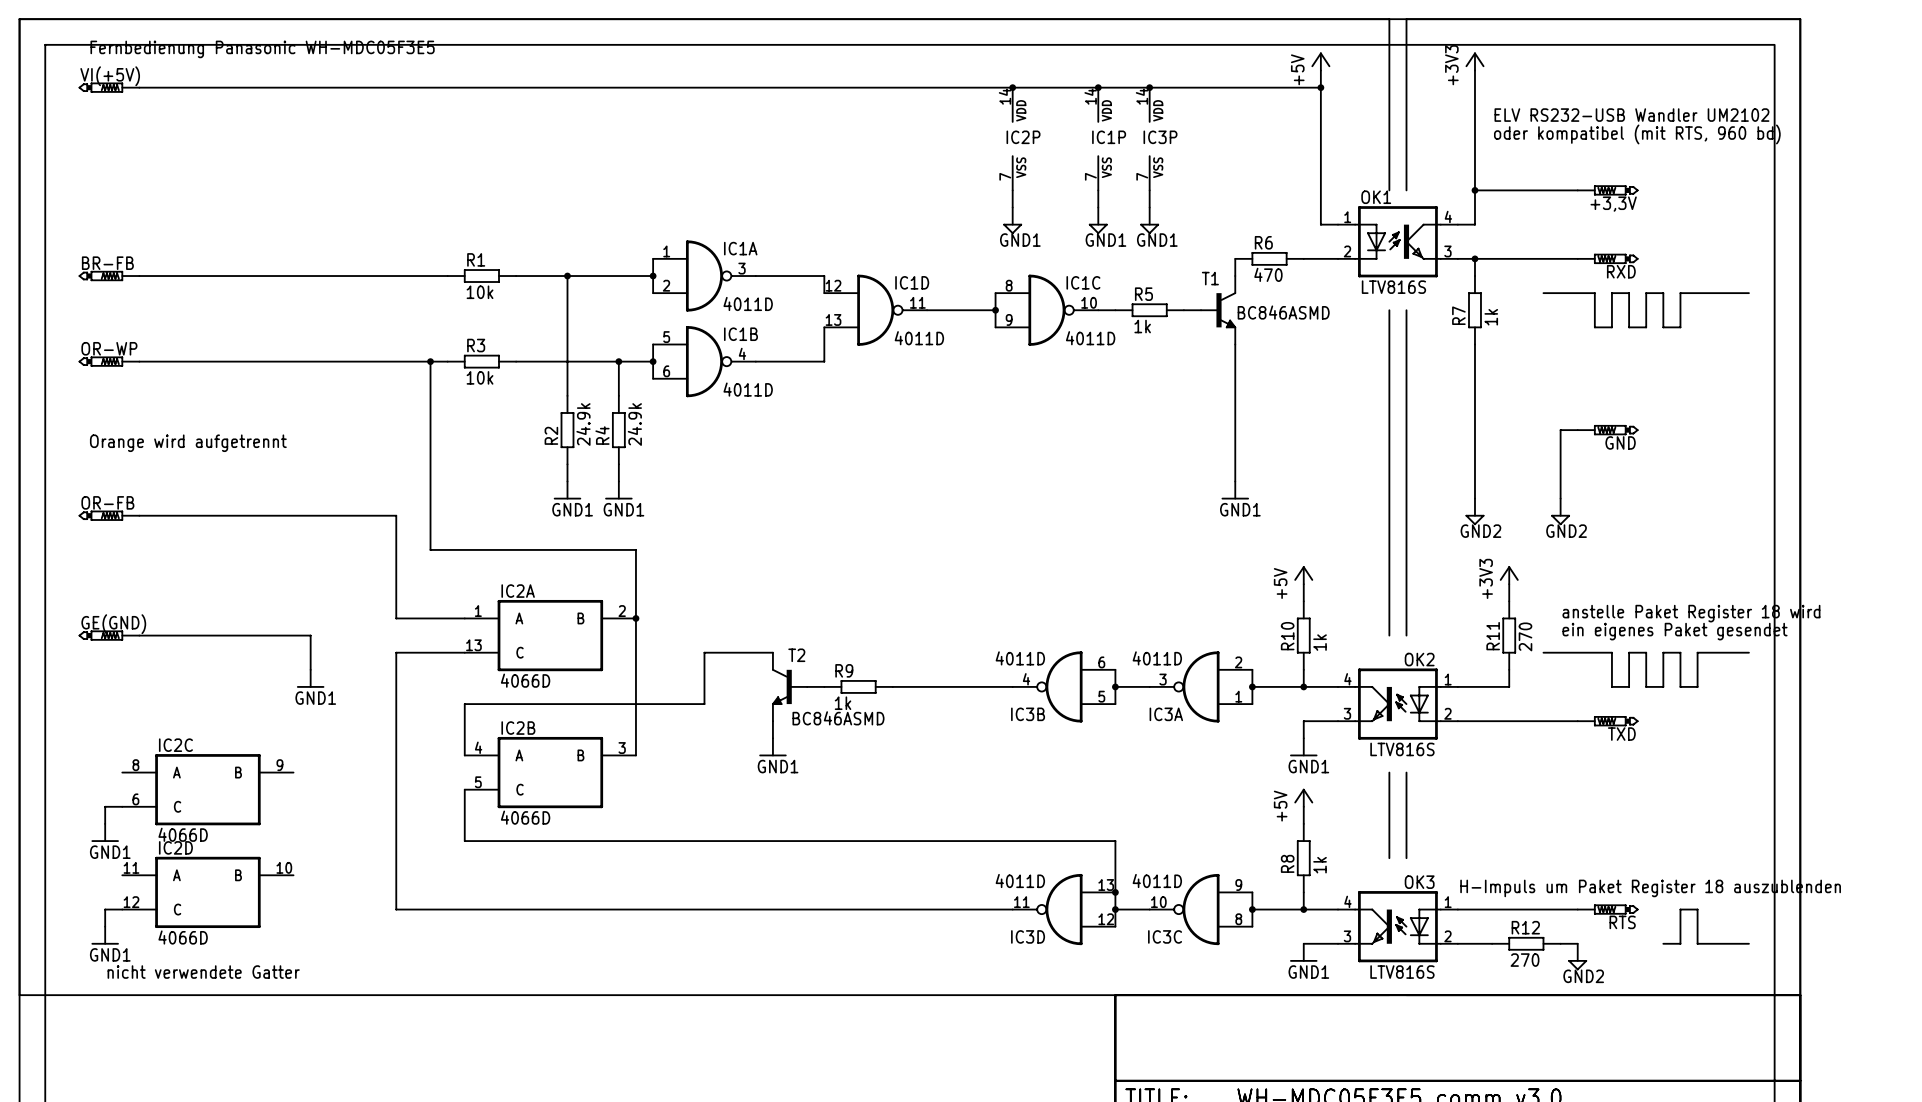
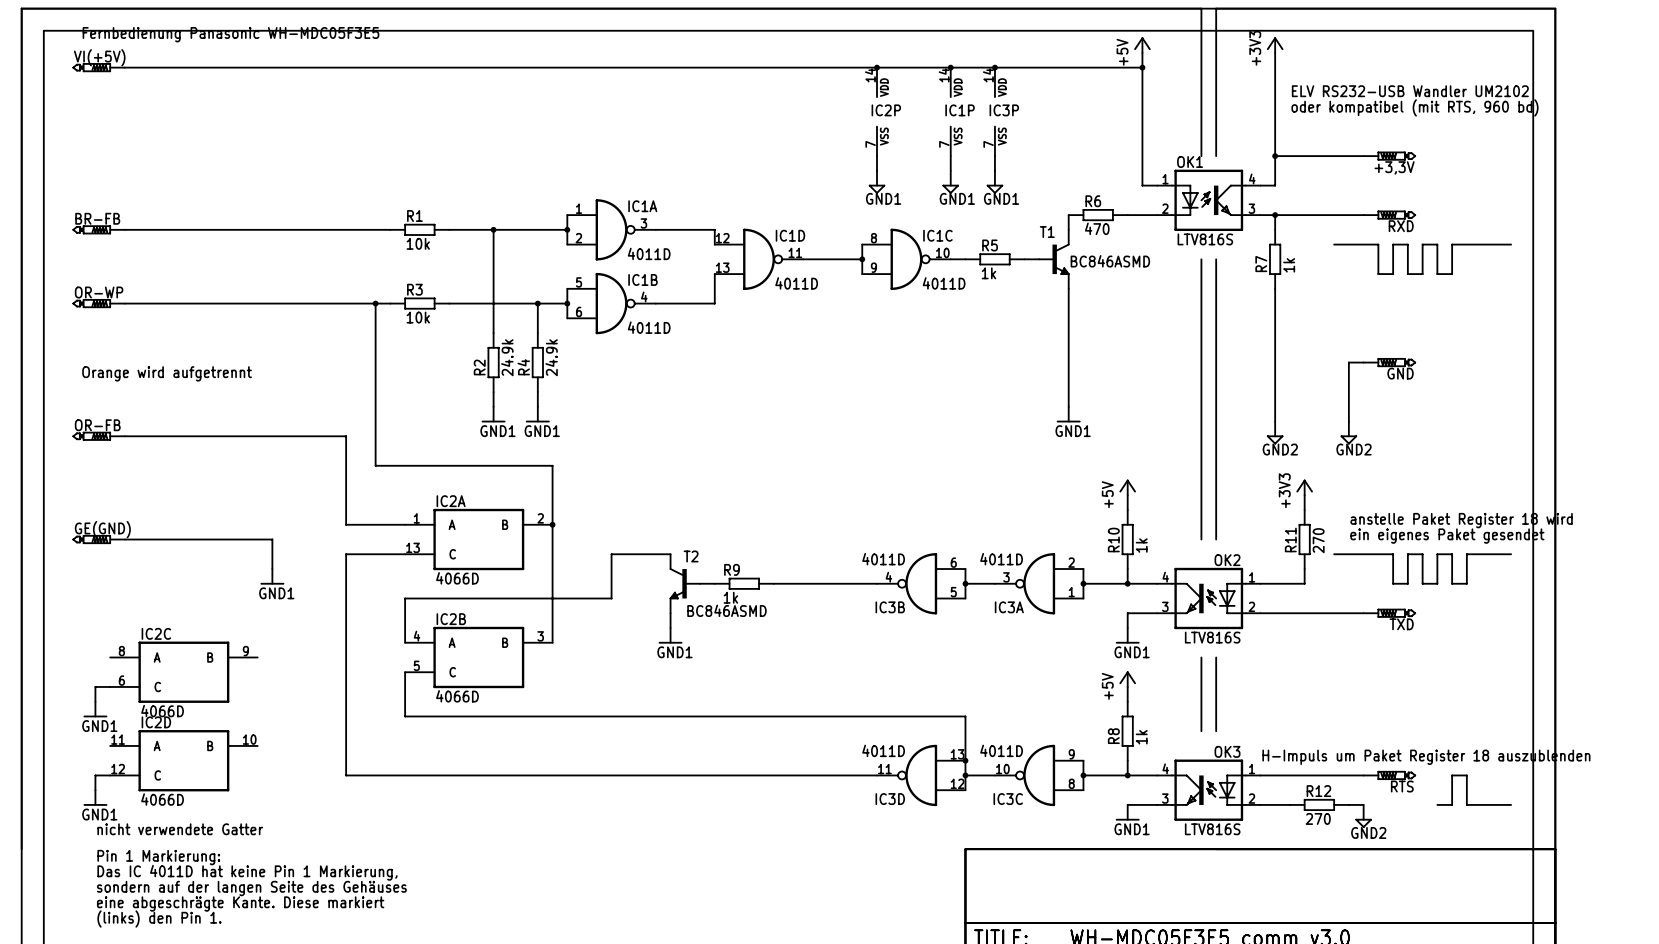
line: (19, 995) (1389, 995) -> none
text: none -> Pin 1 Markierung: (158, 857)
text: none -> Das IC 4011D hat keine Pin 1 Markierung, (247, 872)
text: none -> sondern auf der langen Seite des Gehäuses (251, 888)
text: none -> eine abgeschrägte Kante. Diese markiert (240, 904)
text: none -> (links) den Pin 1. (159, 918)

